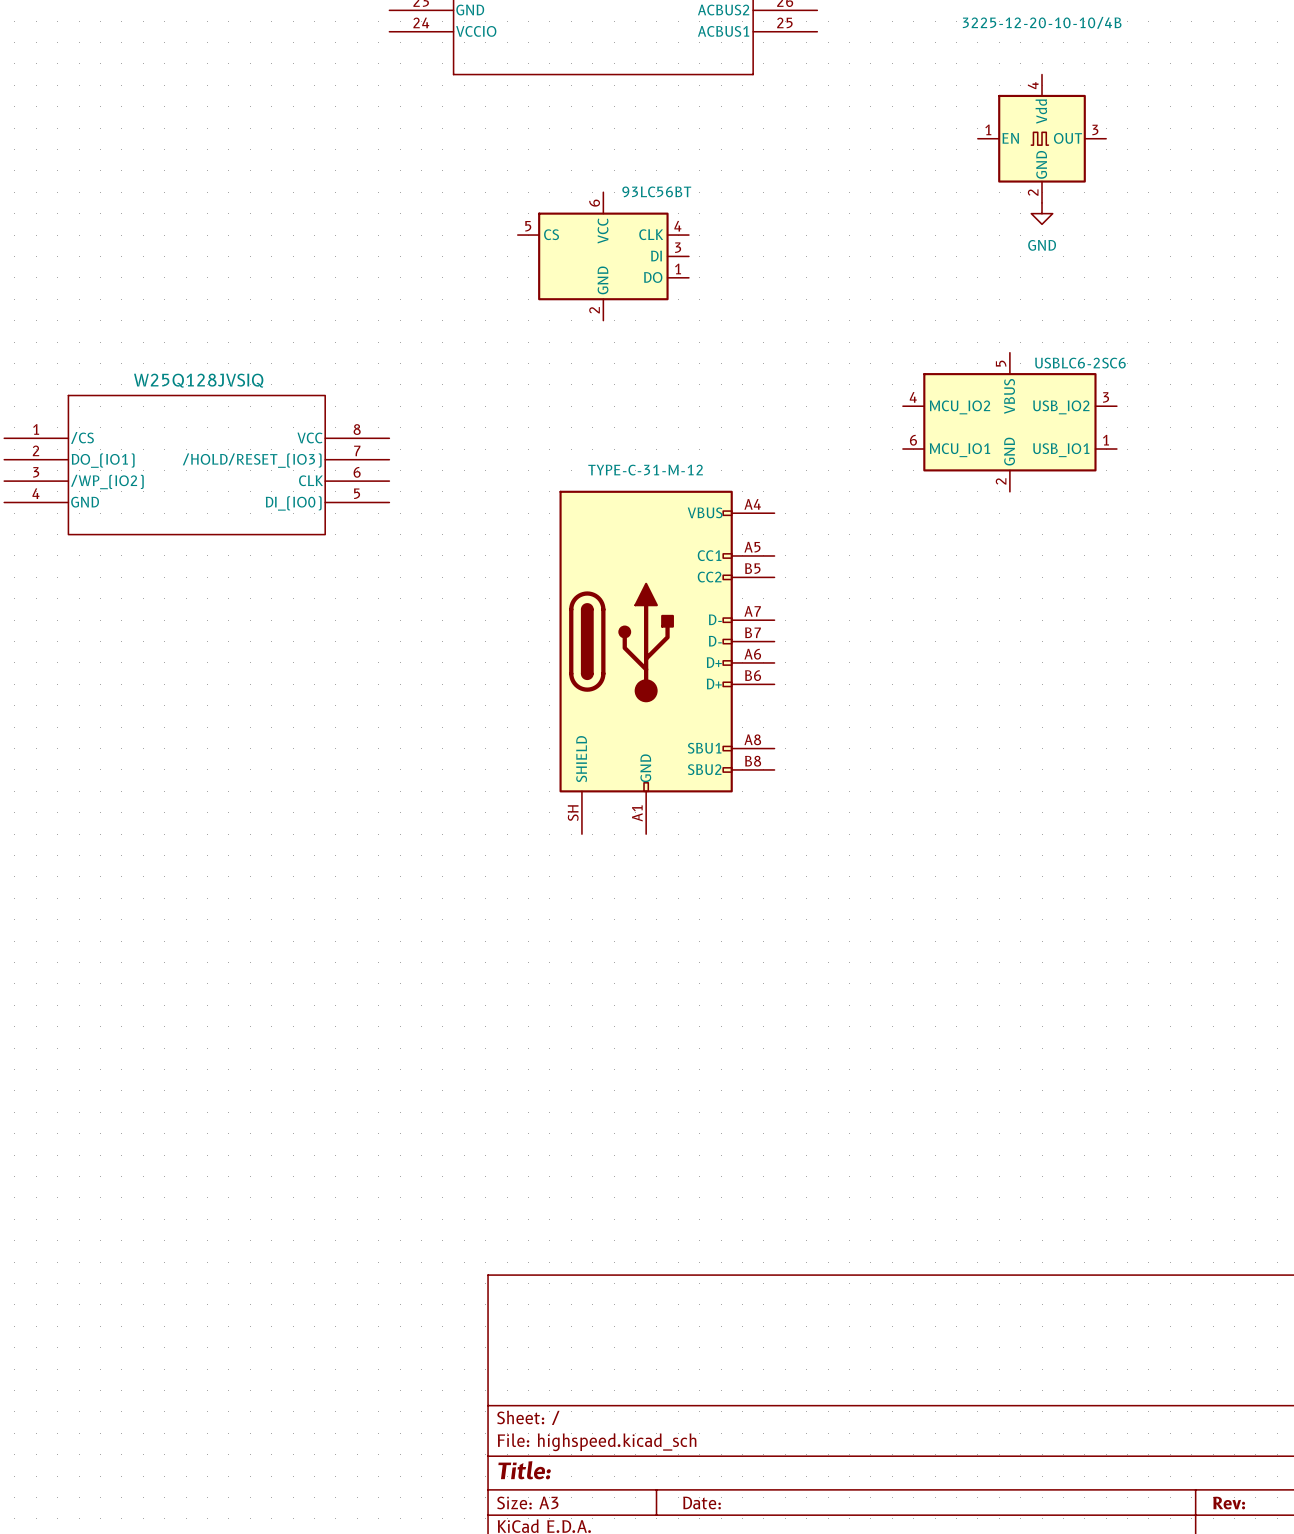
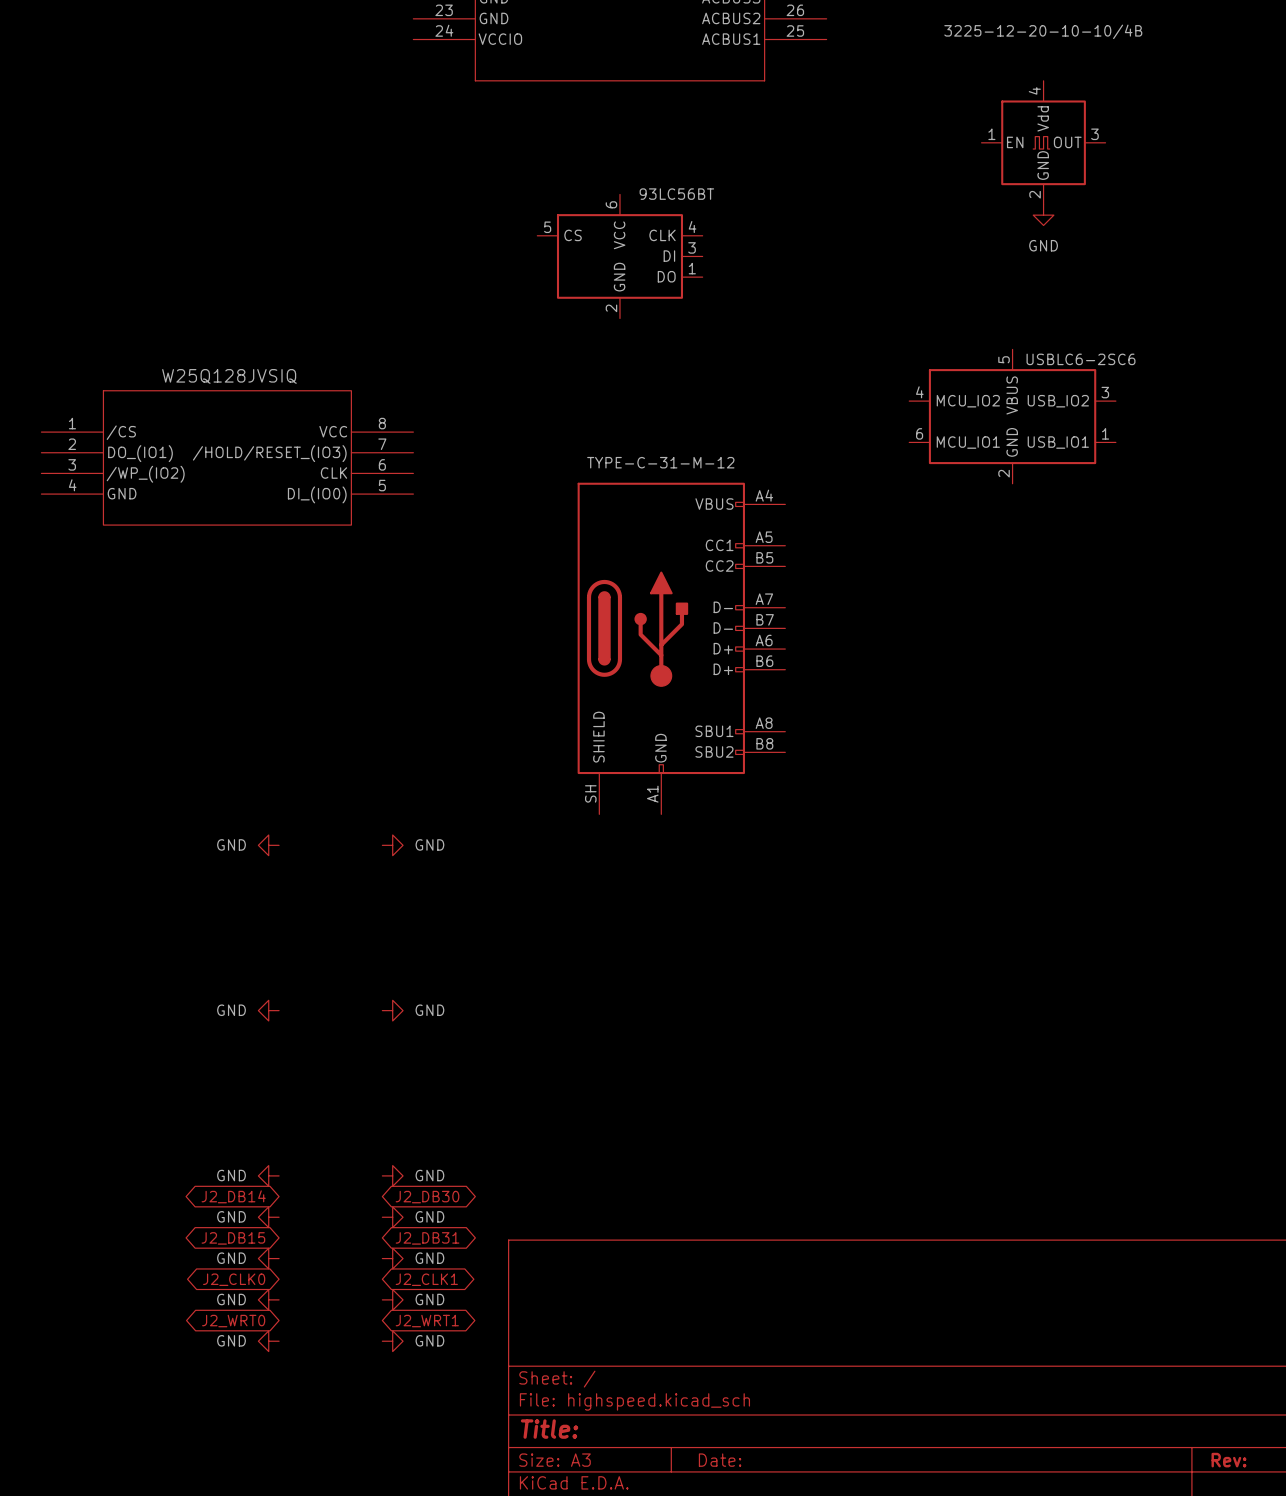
power symbol: none -> GND (268, 845)
power symbol: none -> GND (392, 845)
power symbol: none -> GND (268, 1010)
power symbol: none -> GND (392, 1010)
power symbol: none -> GND (268, 1175)
power symbol: none -> GND (392, 1175)
global label: none -> J2_DB14 (233, 1196)
global label: none -> J2_DB30 (427, 1197)
power symbol: none -> GND (268, 1217)
power symbol: none -> GND (392, 1217)
global label: none -> J2_DB15 (233, 1238)
global label: none -> J2_DB31 (427, 1238)
power symbol: none -> GND (268, 1258)
power symbol: none -> GND (392, 1258)
global label: none -> J2_CLK0 (234, 1279)
global label: none -> J2_CLK1 (426, 1279)
power symbol: none -> GND (268, 1299)
power symbol: none -> GND (392, 1299)
global label: none -> J2_WRT0 (233, 1321)
global label: none -> J2_WRT1 (427, 1321)
power symbol: none -> GND (268, 1341)
power symbol: none -> GND (392, 1341)

